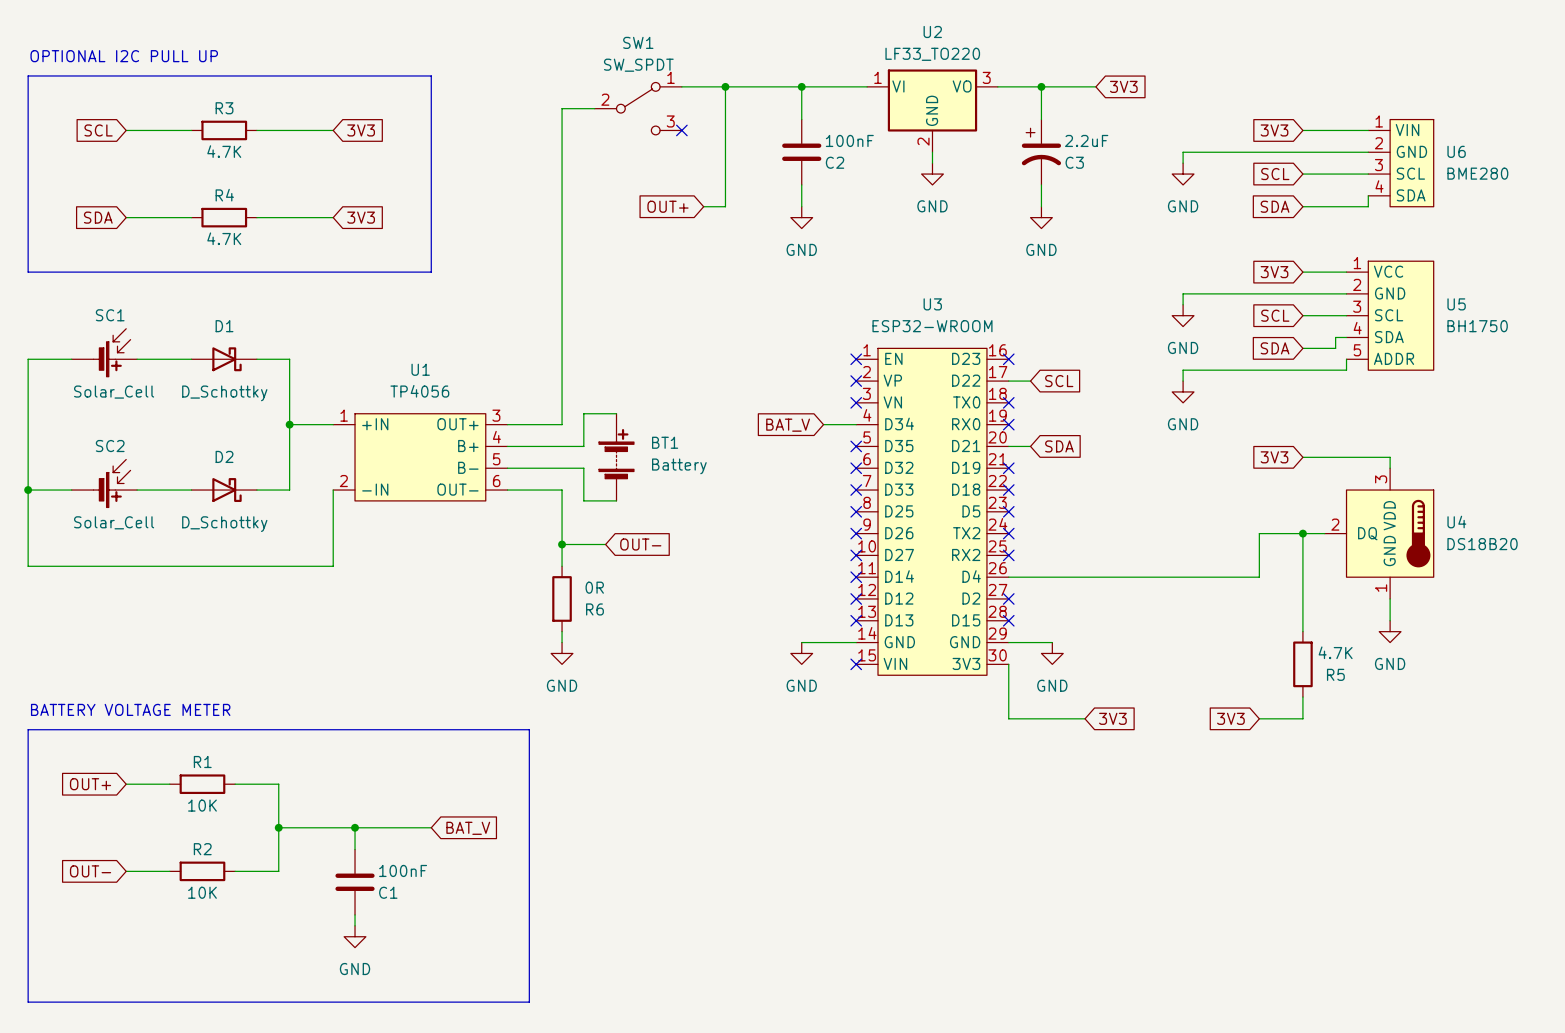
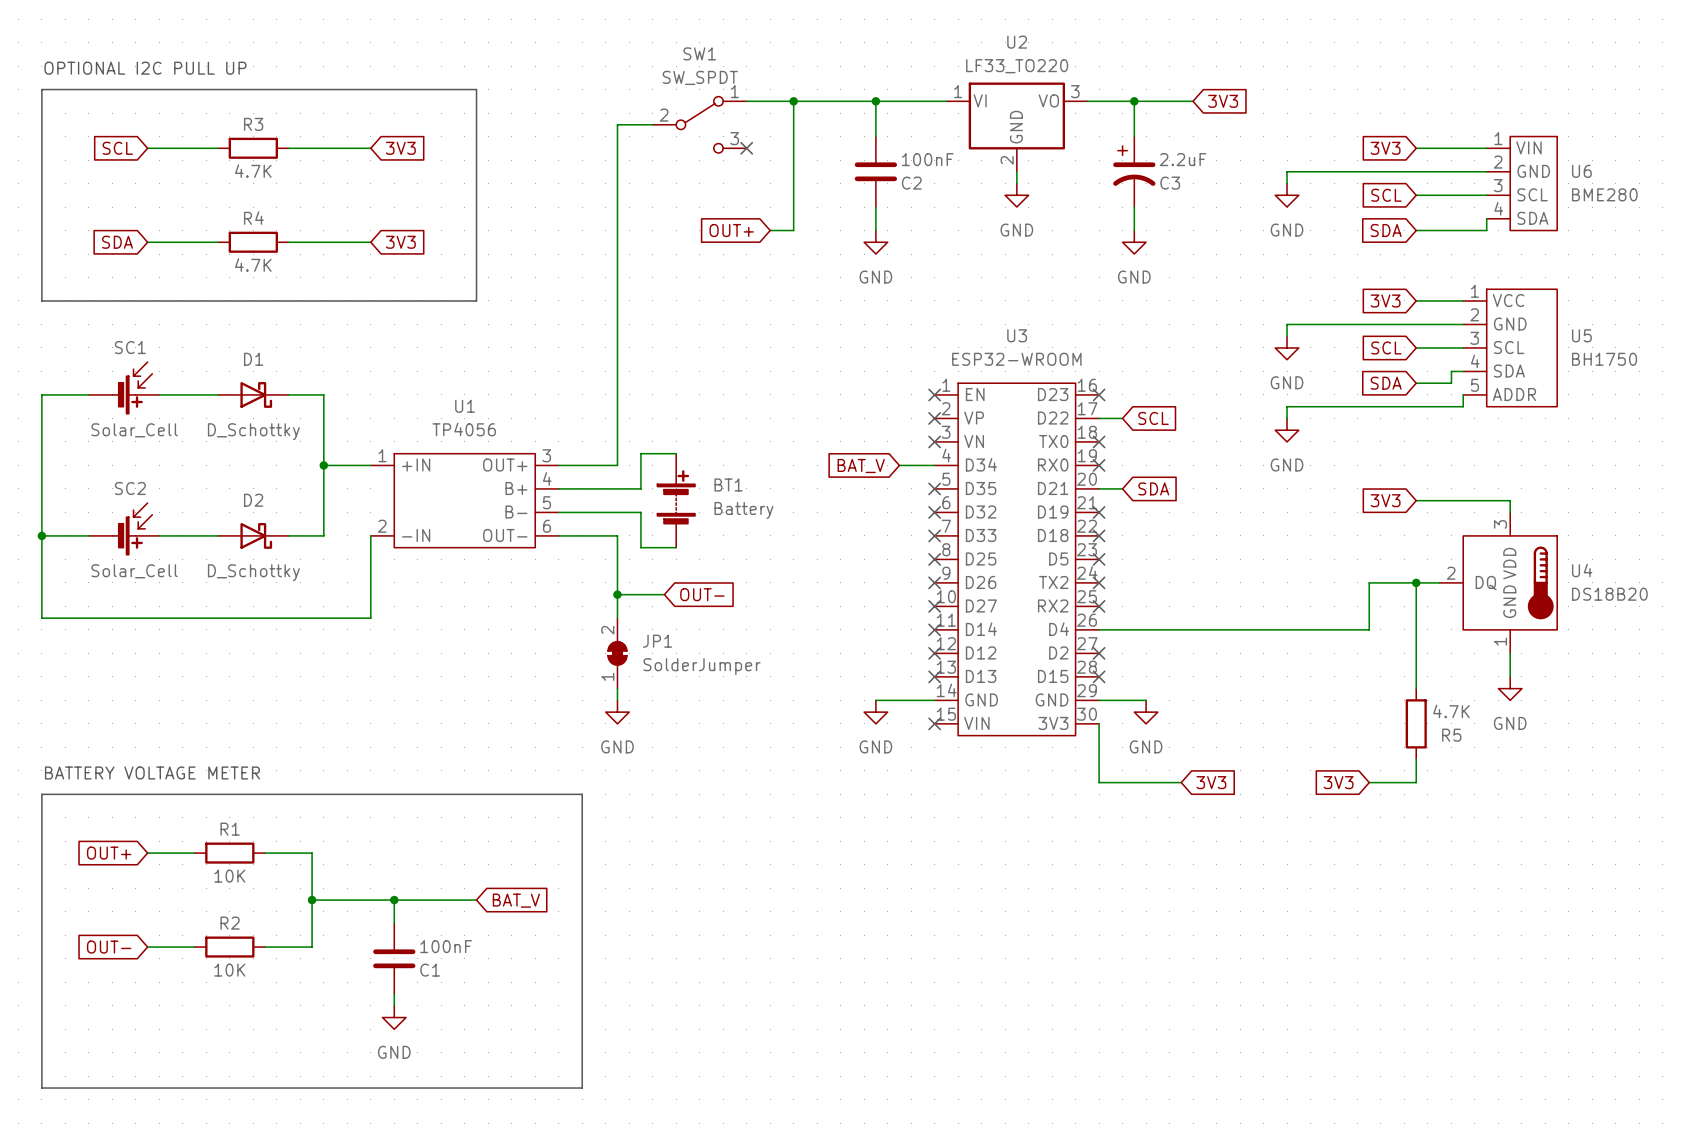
R6: 0R (562, 598) -> none
JP1: none -> SolderJumper (617, 653)

